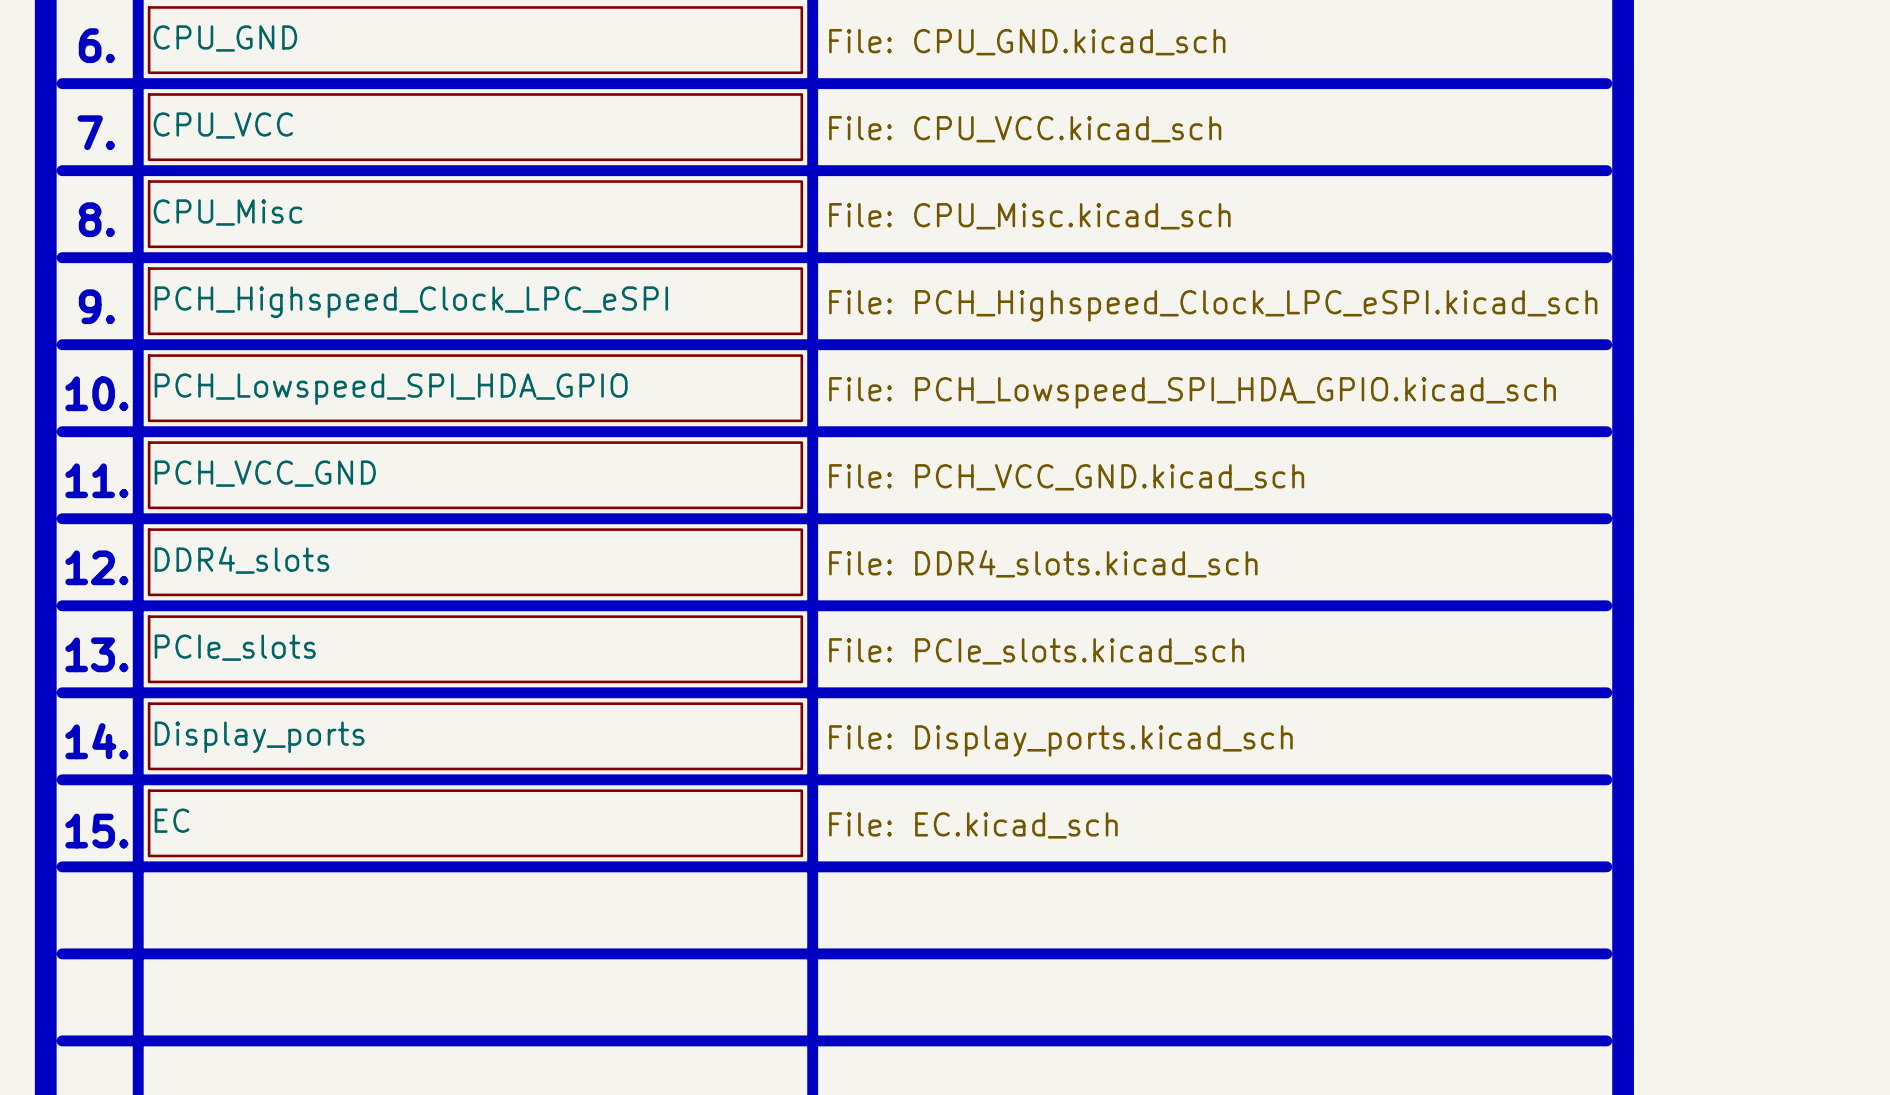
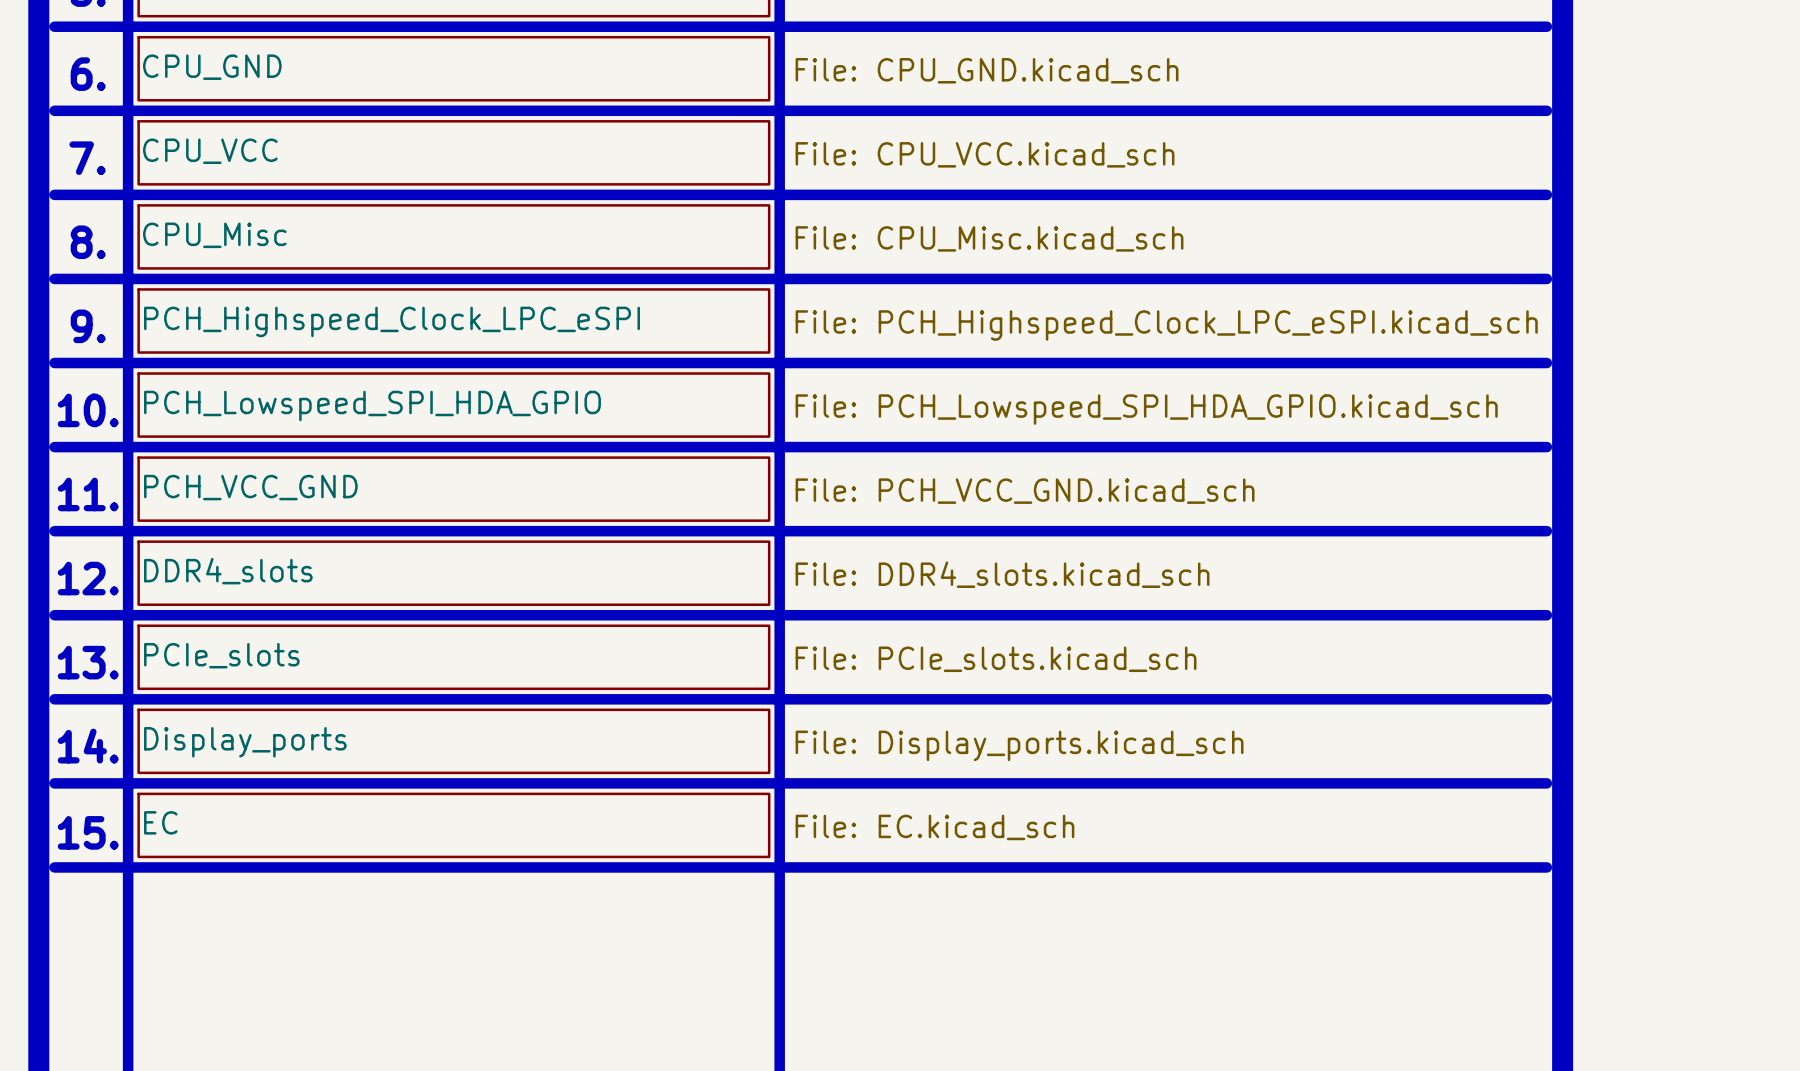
line: (62, 953) (1606, 953) -> none
line: (62, 1040) (1606, 1040) -> none

